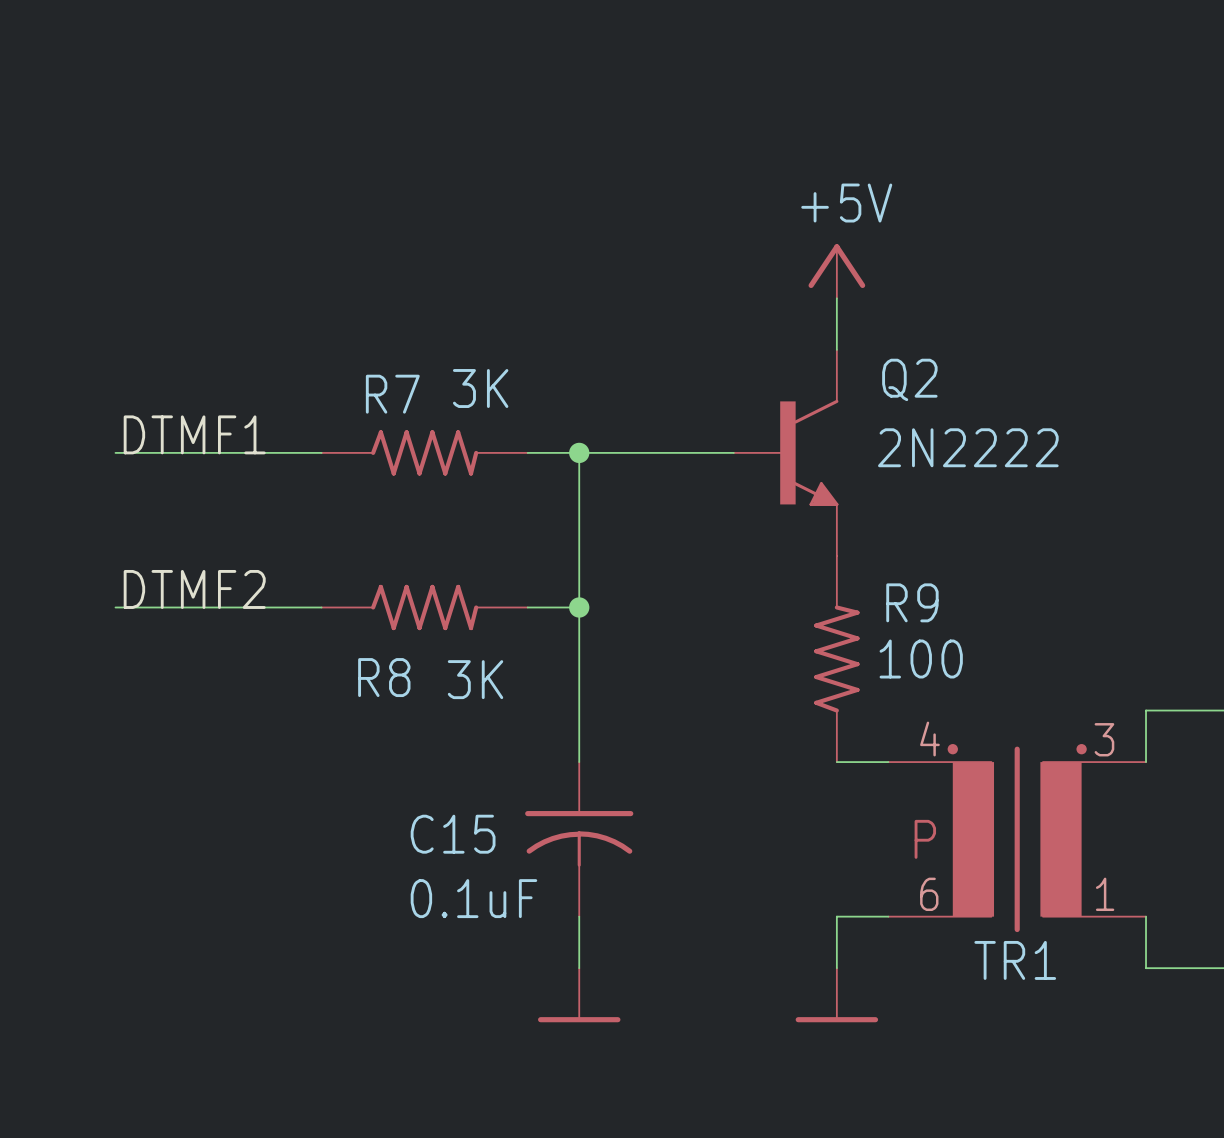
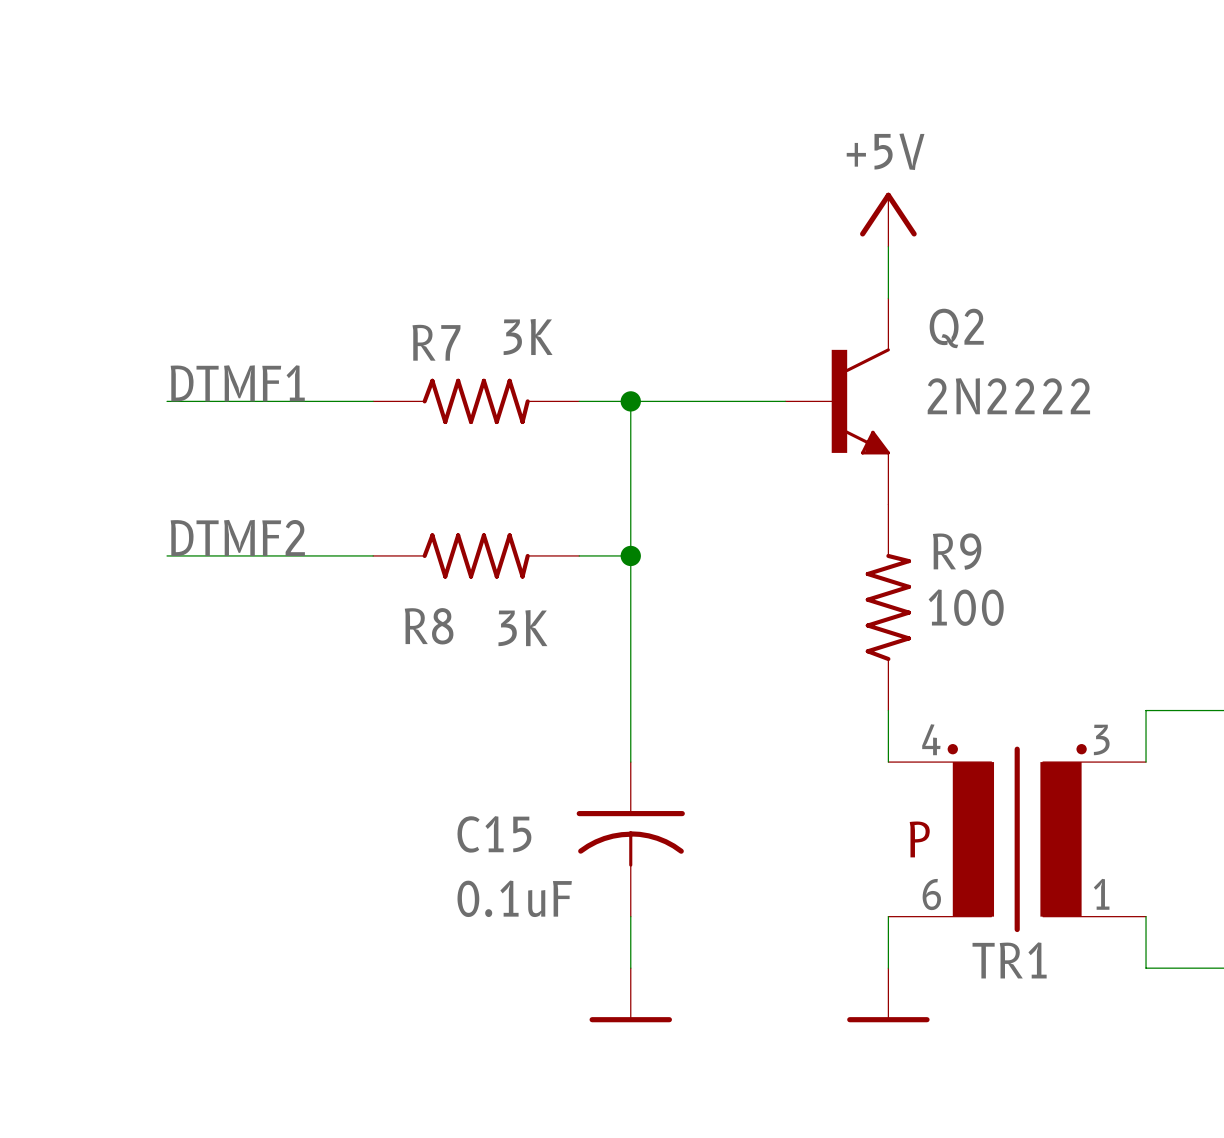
power symbol position: +5V (836, 271) -> +5V (888, 219)
wire: (836, 298) (836, 349) -> (888, 246) (888, 298)
wire: none -> (630, 401) (630, 762)
junction: none -> (630, 401)
label position: DTMF1 (194, 434) -> DTMF1 (237, 383)
wire: (115, 452) (321, 452) -> (167, 401) (373, 401)
R7 position: (424, 452) -> (476, 401)
wire: (527, 452) (733, 452) -> (579, 401) (785, 401)
wire: (579, 452) (579, 762) -> none
junction: (579, 452) -> none
Q2 position: (786, 452) -> (837, 401)
junction: none -> (630, 555)
label position: DTMF2 (194, 589) -> DTMF2 (237, 537)
wire: (115, 607) (321, 607) -> (167, 555) (373, 555)
R8 position: (424, 607) -> (476, 555)
wire: (527, 607) (579, 607) -> (579, 555) (630, 555)
junction: (579, 607) -> none
R9 position: (836, 659) -> (888, 607)
wire: (836, 762) (888, 762) -> (888, 710) (888, 762)
C15 position: (579, 839) -> (630, 839)
wire: (579, 916) (579, 968) -> (630, 916) (630, 968)
wire: (888, 916) (836, 916) (836, 968) -> (888, 916) (888, 968)
power symbol position: (579, 995) -> (630, 995)
power symbol position: (836, 995) -> (888, 995)

